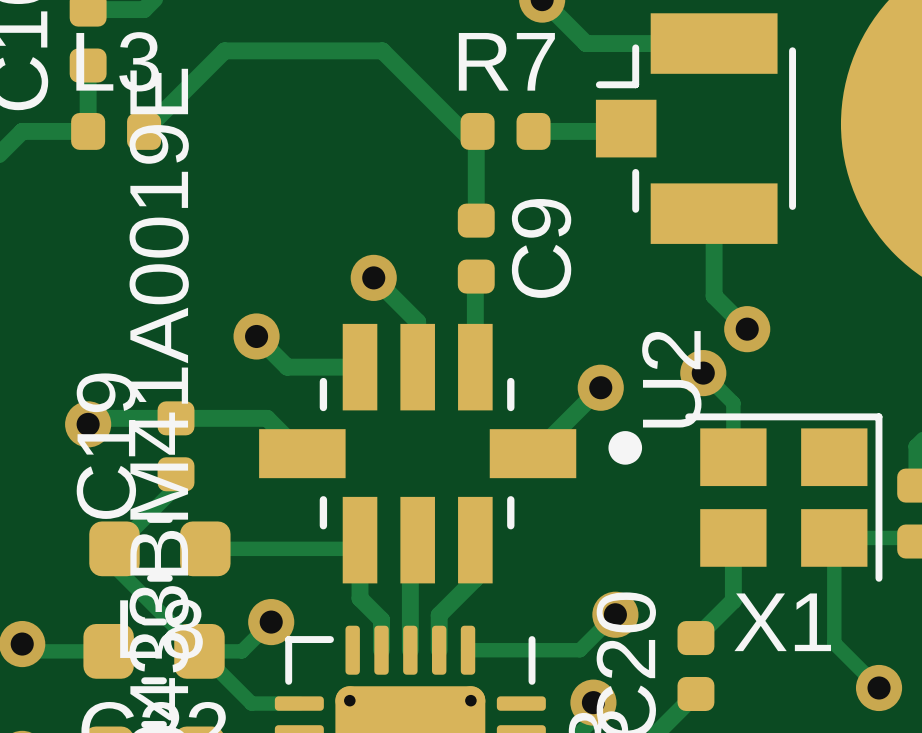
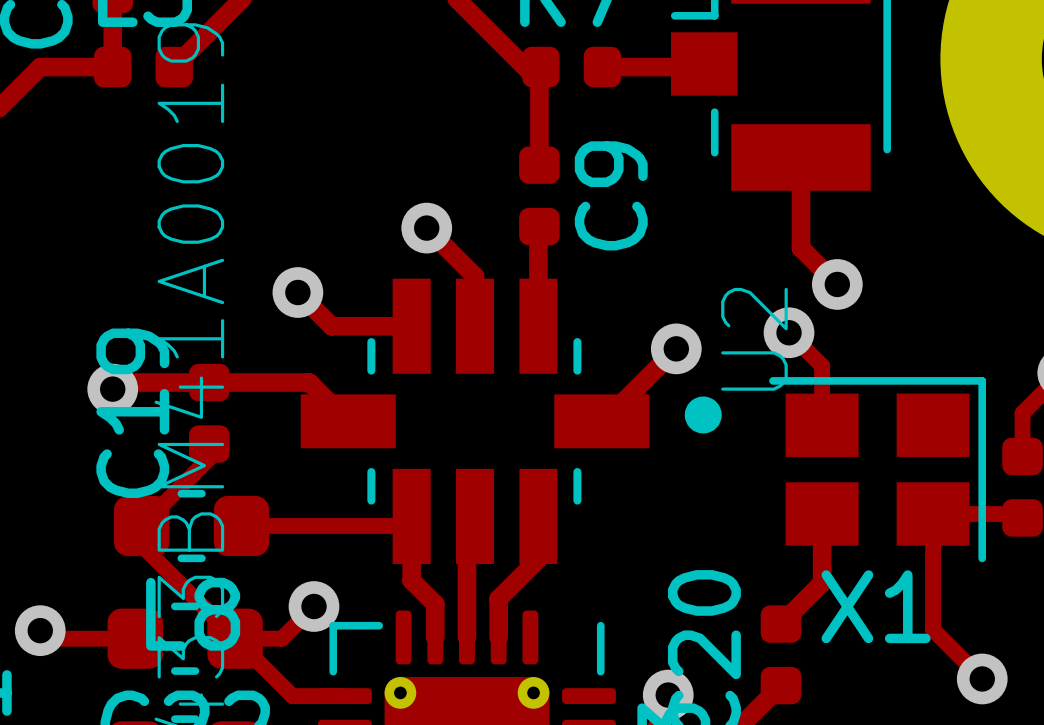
track: (615, 614) (579, 650) (468, 650) -> none
via: (615, 614) -> none

